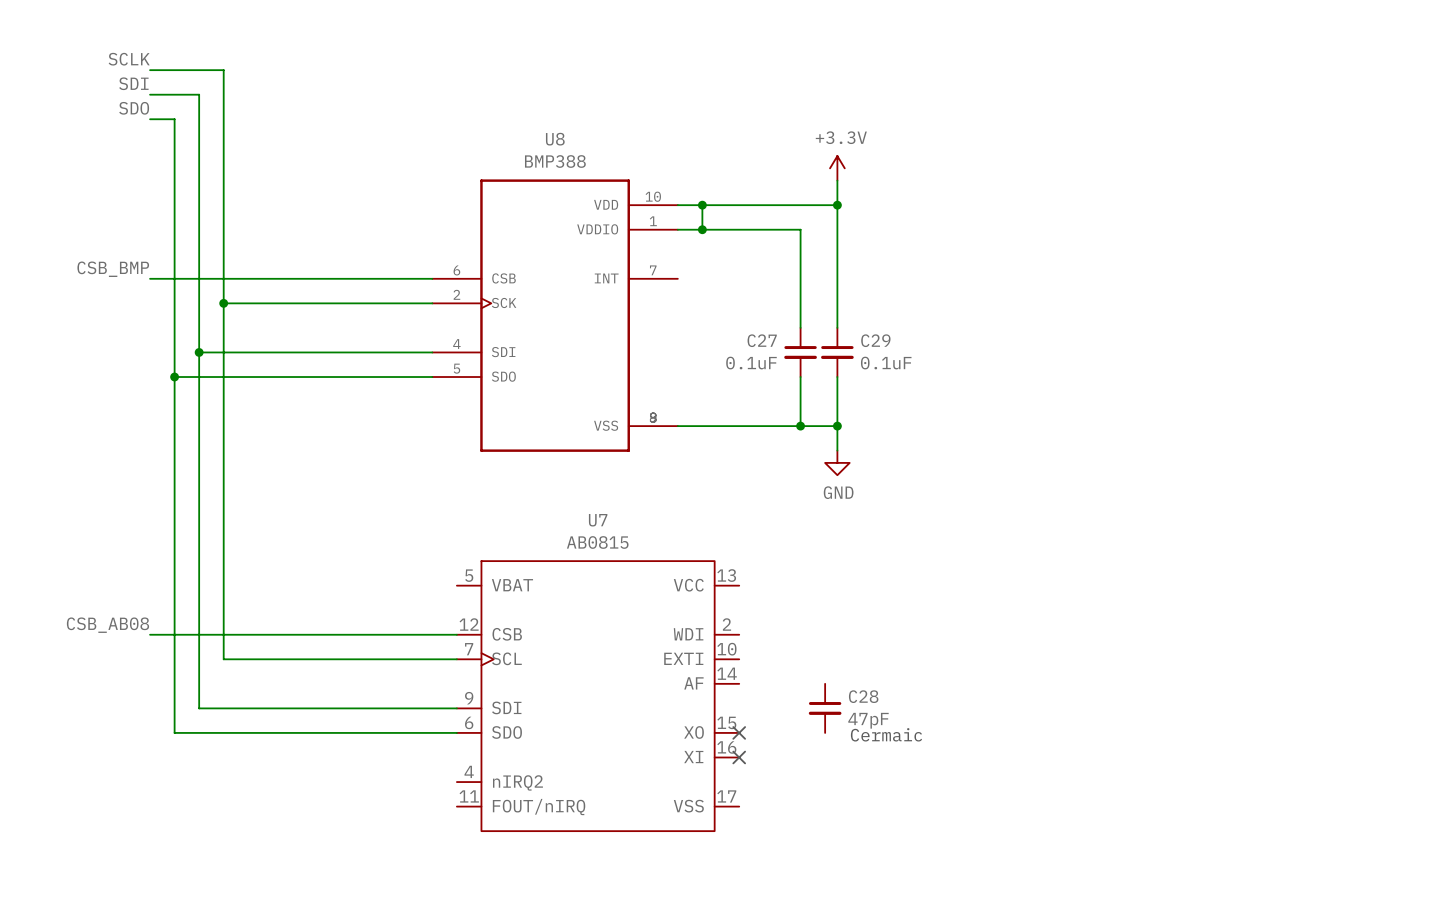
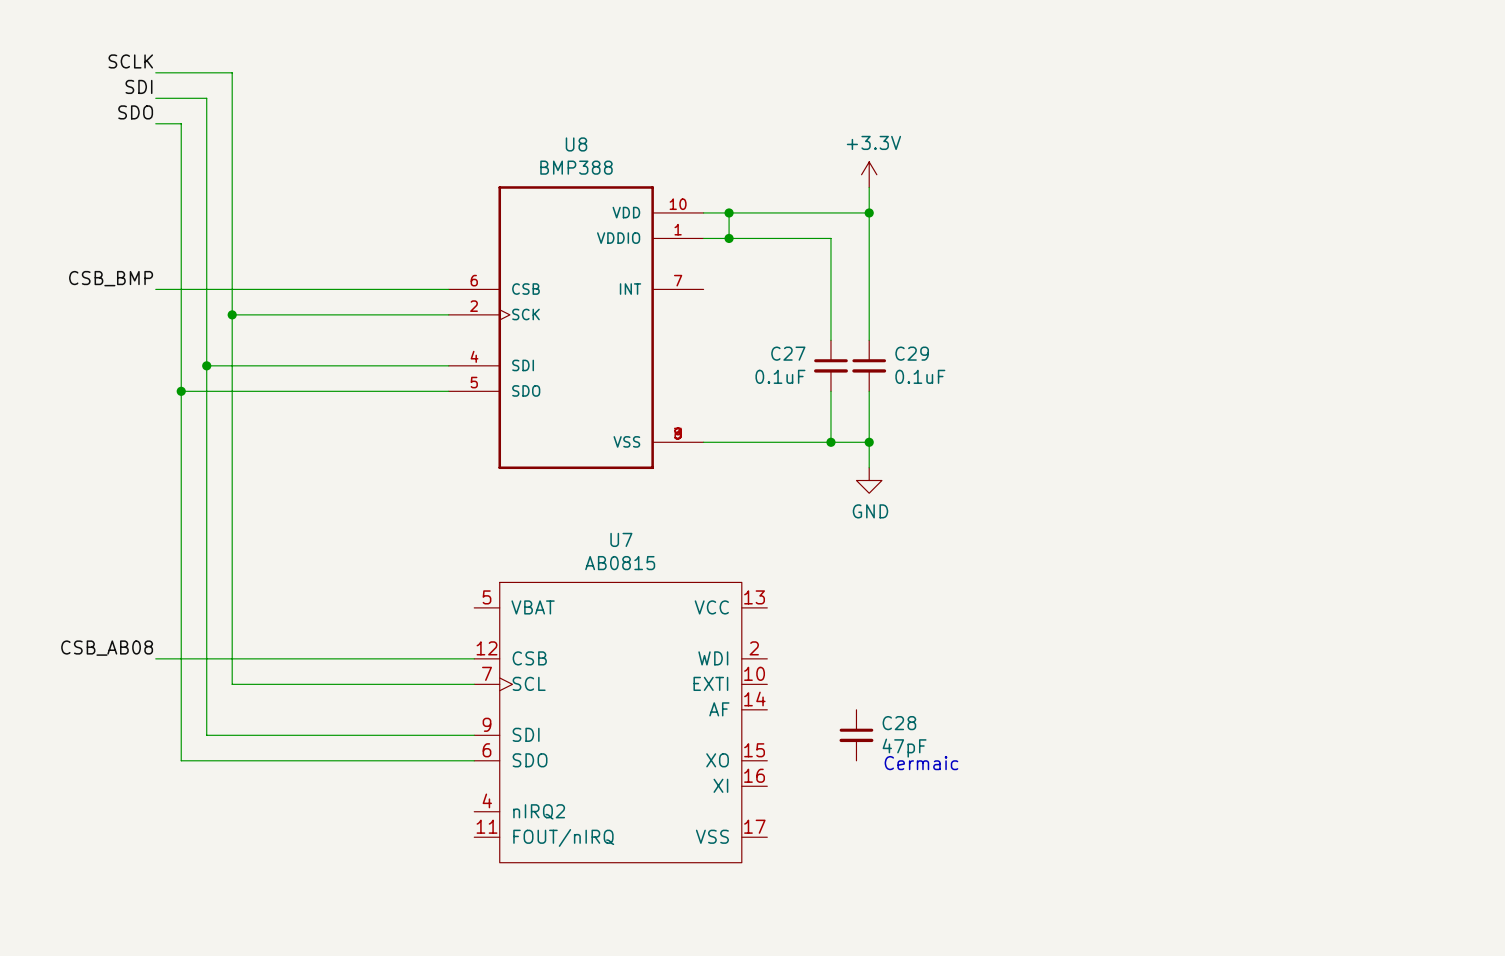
no-connect mark: (739, 732) -> none
no-connect mark: (739, 757) -> none

